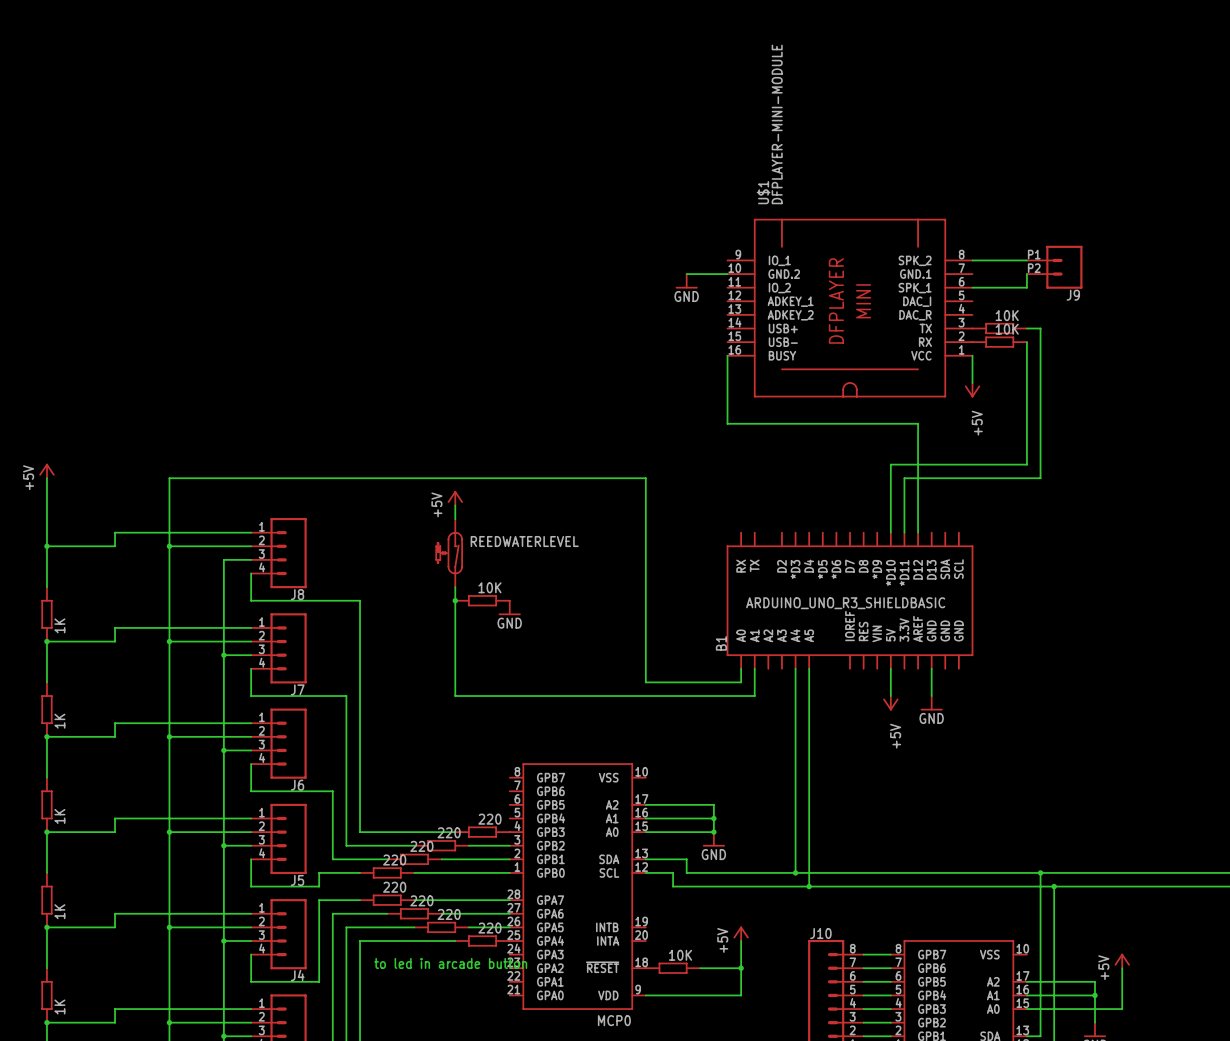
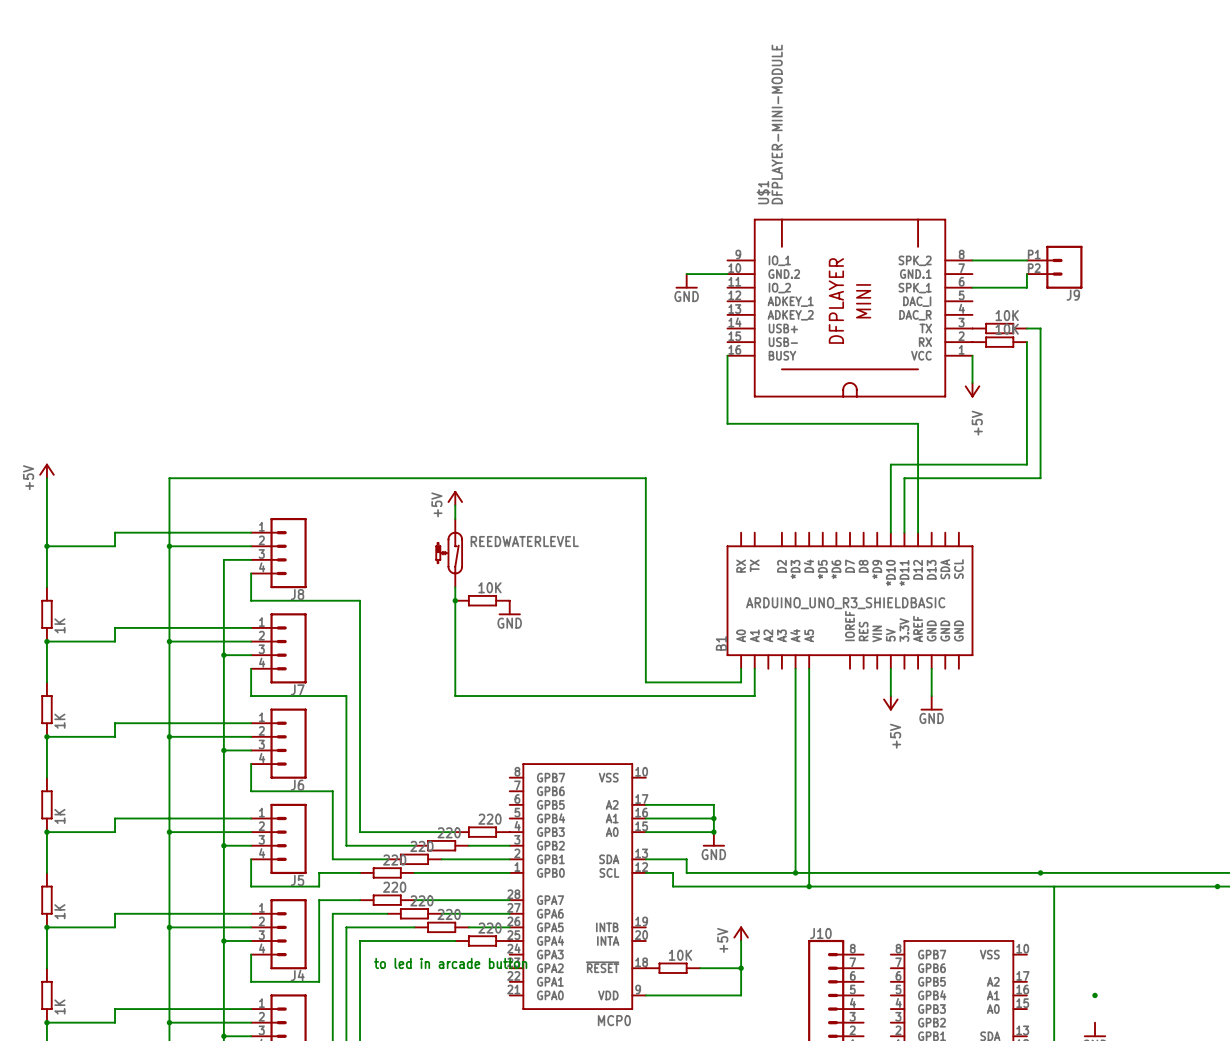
wire: (1040, 872) (1040, 1036) (1026, 1036) -> none
junction: (1054, 886) -> none
junction: none -> (1217, 886)
wire: (863, 954) (890, 954) -> none
power symbol: +5V (1122, 961) -> none
wire: (863, 968) (890, 968) -> none
wire: (1122, 968) (1122, 1009) (1026, 1009) -> none
wire: (863, 981) (890, 981) -> none
wire: (1026, 981) (1095, 981) (1095, 1022) -> none
wire: (863, 995) (890, 995) -> none
wire: (1026, 995) (1095, 995) -> none
wire: (863, 1009) (890, 1009) -> none
wire: (863, 1022) (890, 1022) -> none
wire: (863, 1036) (890, 1036) -> none

